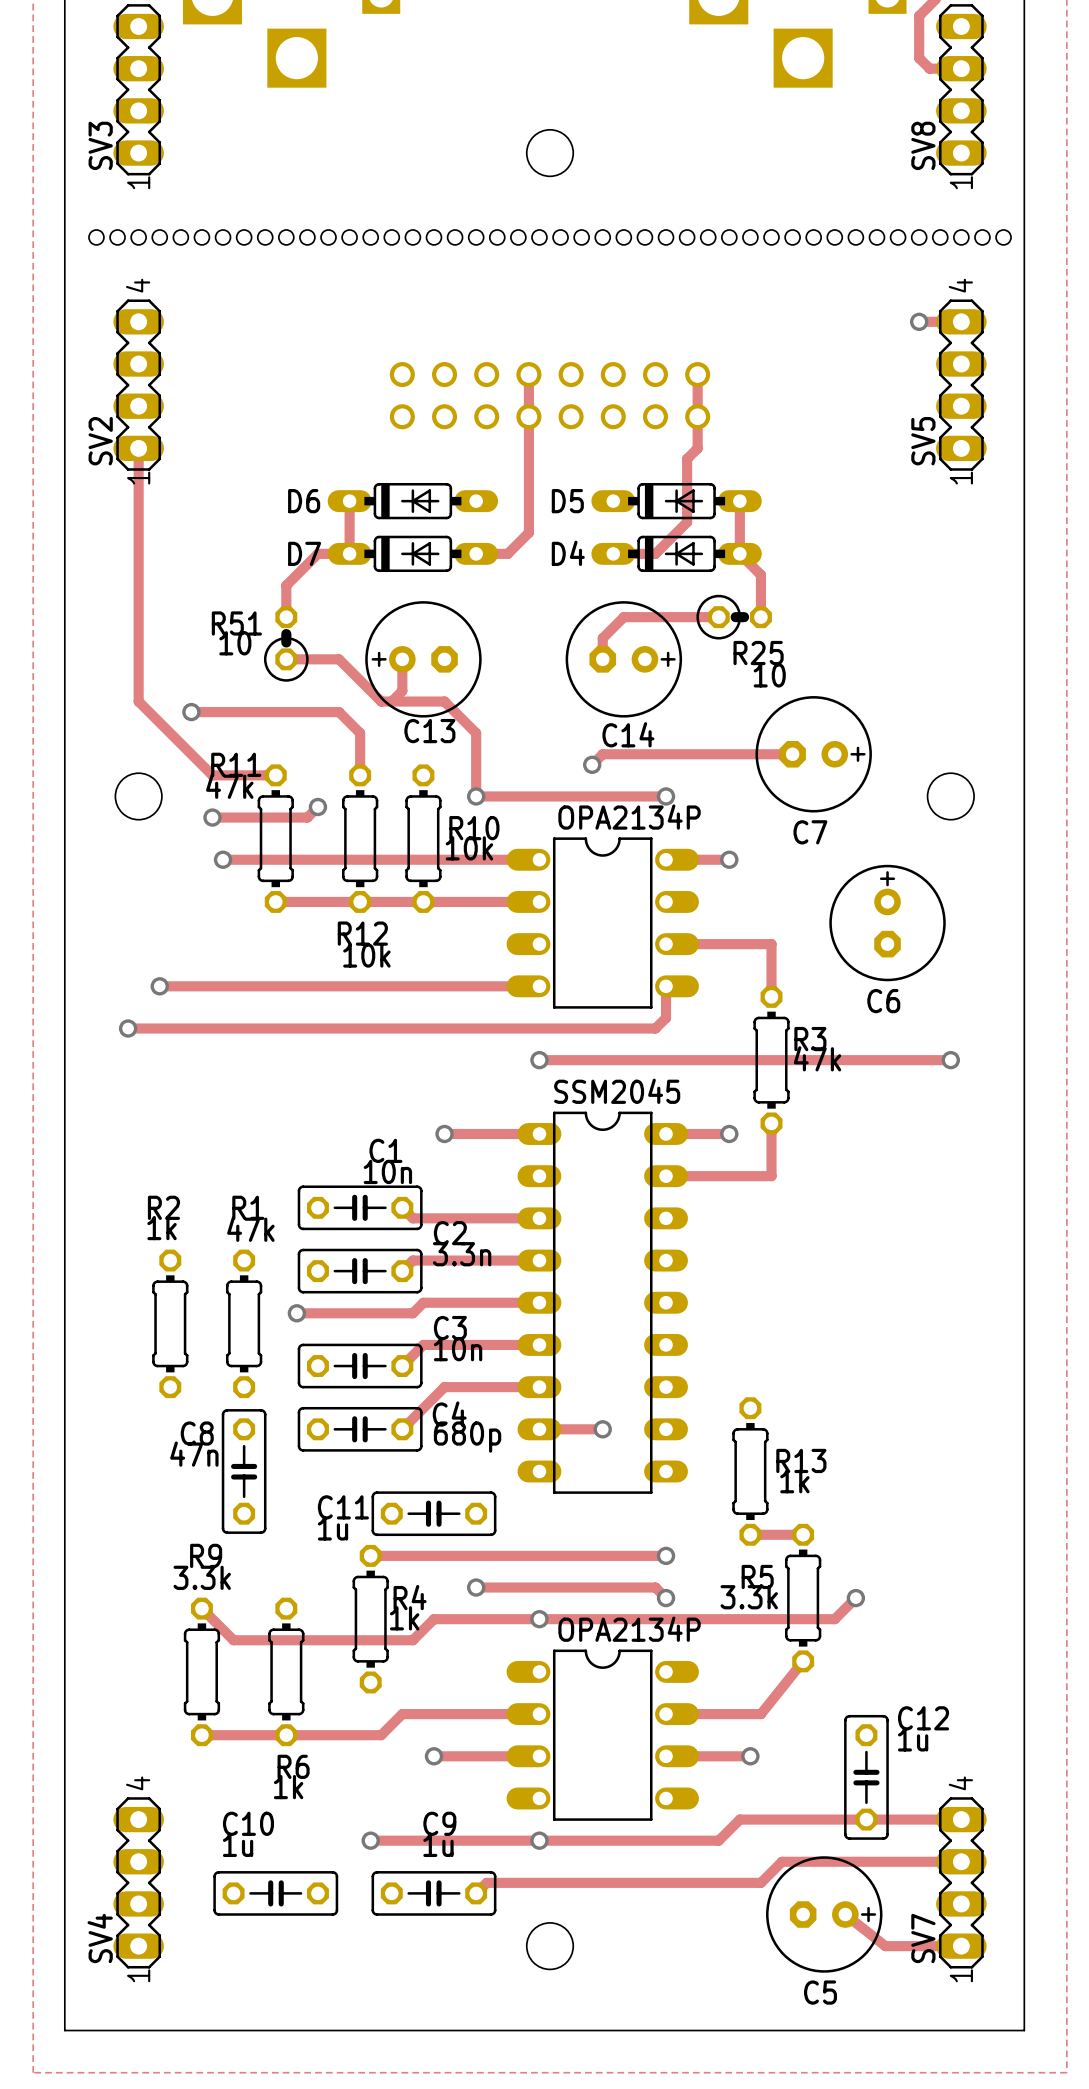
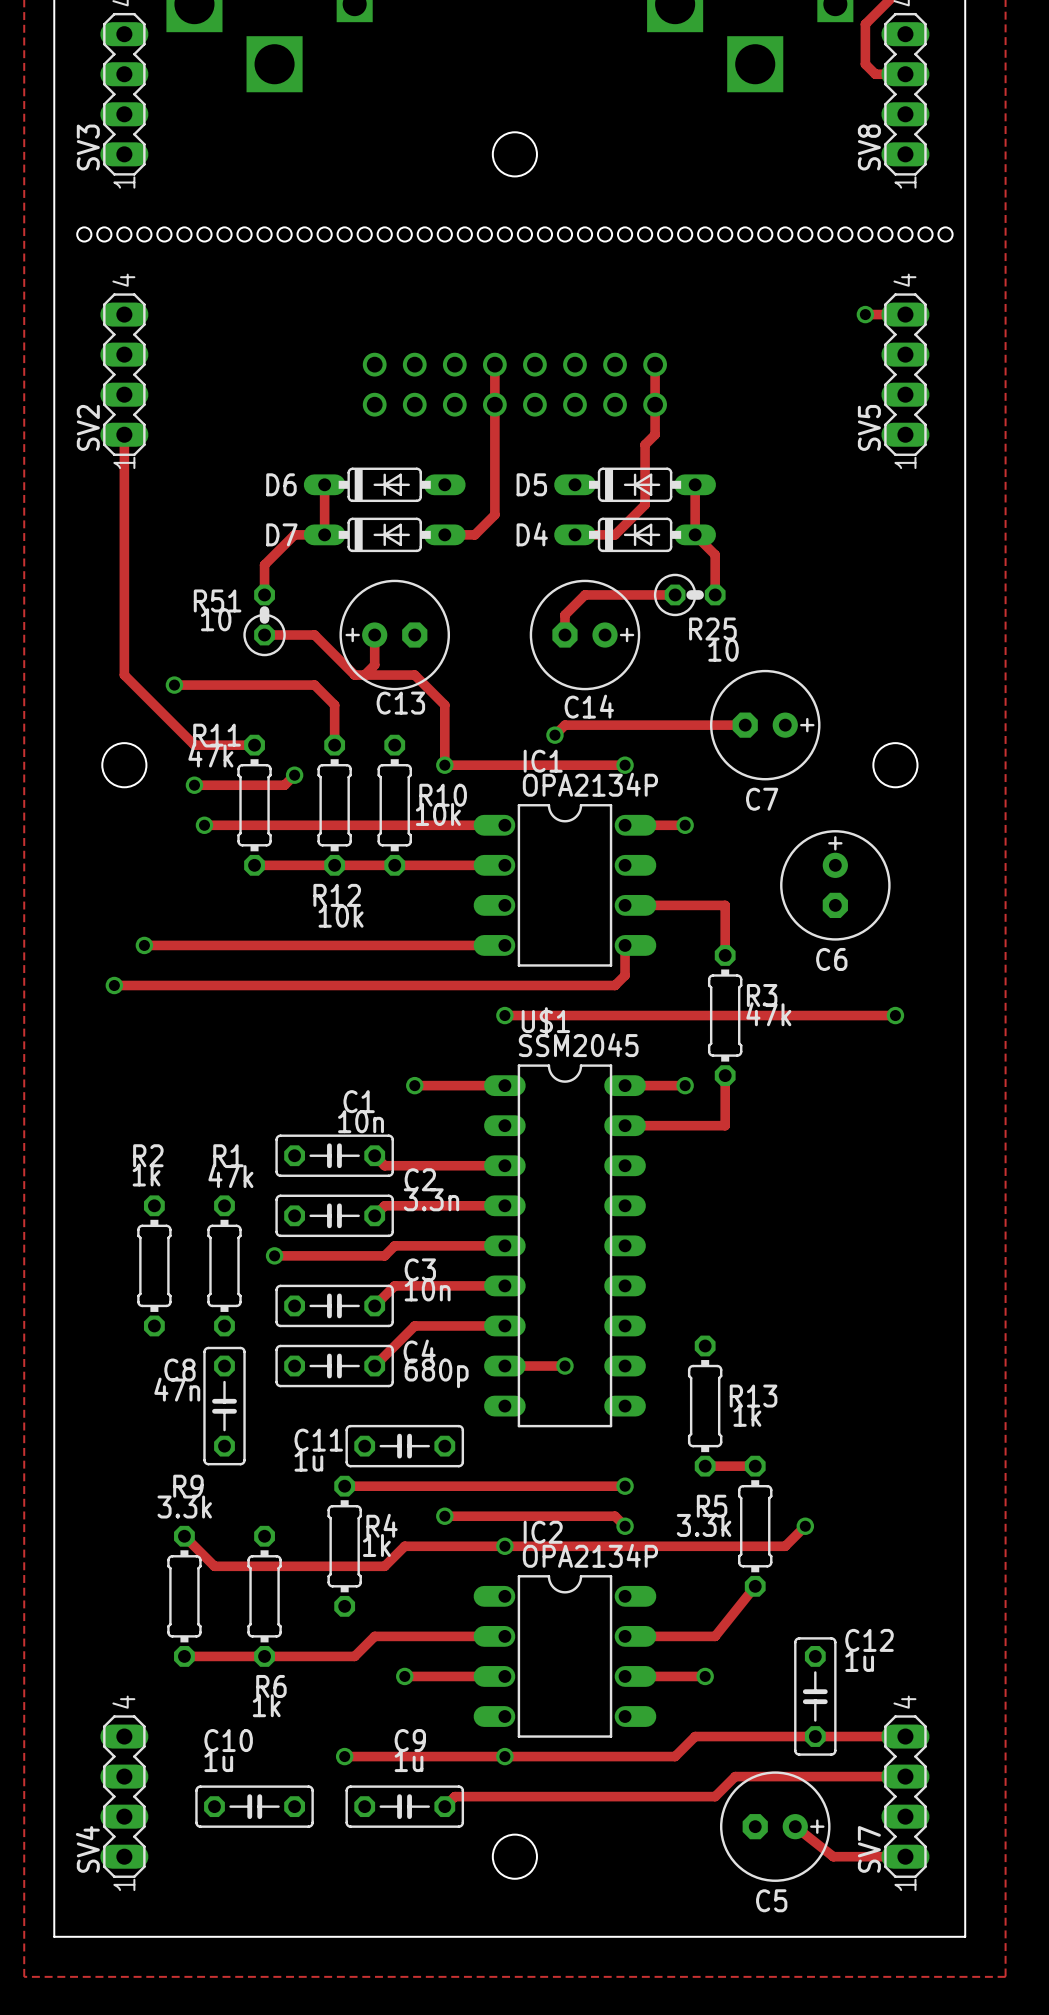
IC1 name: none -> IC1 (543, 761)
U$1 name: none -> U$1 (545, 1021)
IC2 name: none -> IC2 (543, 1532)

